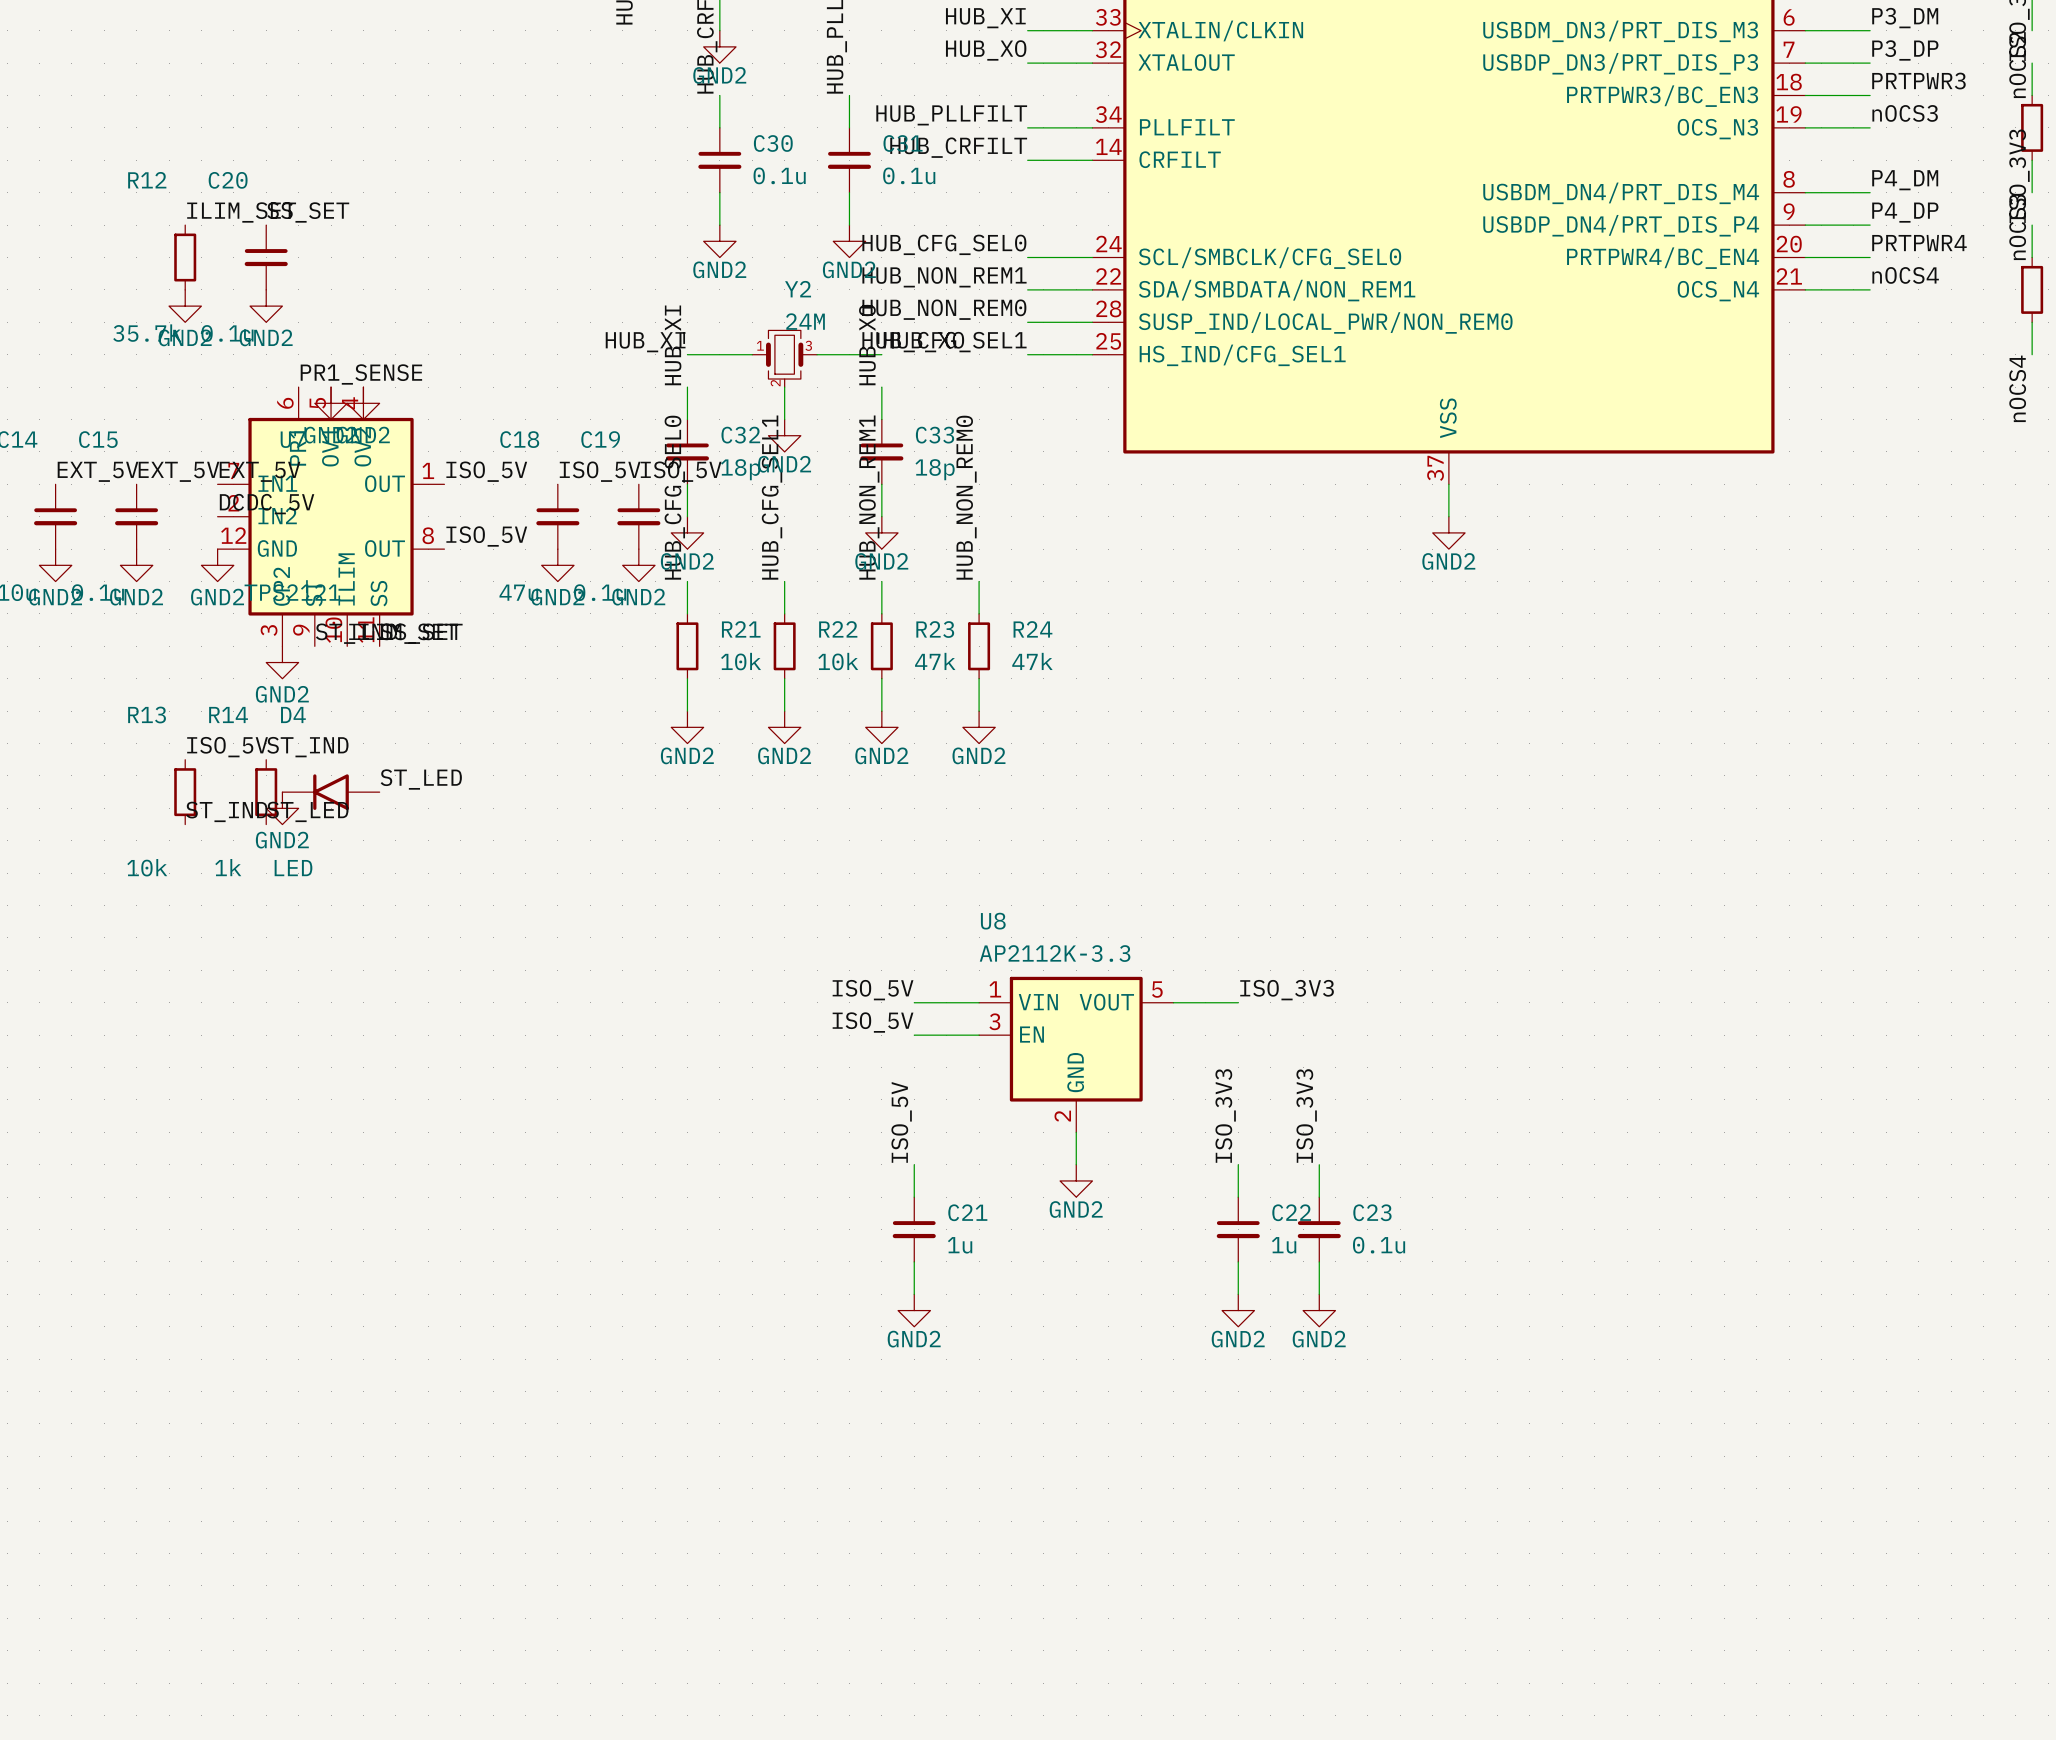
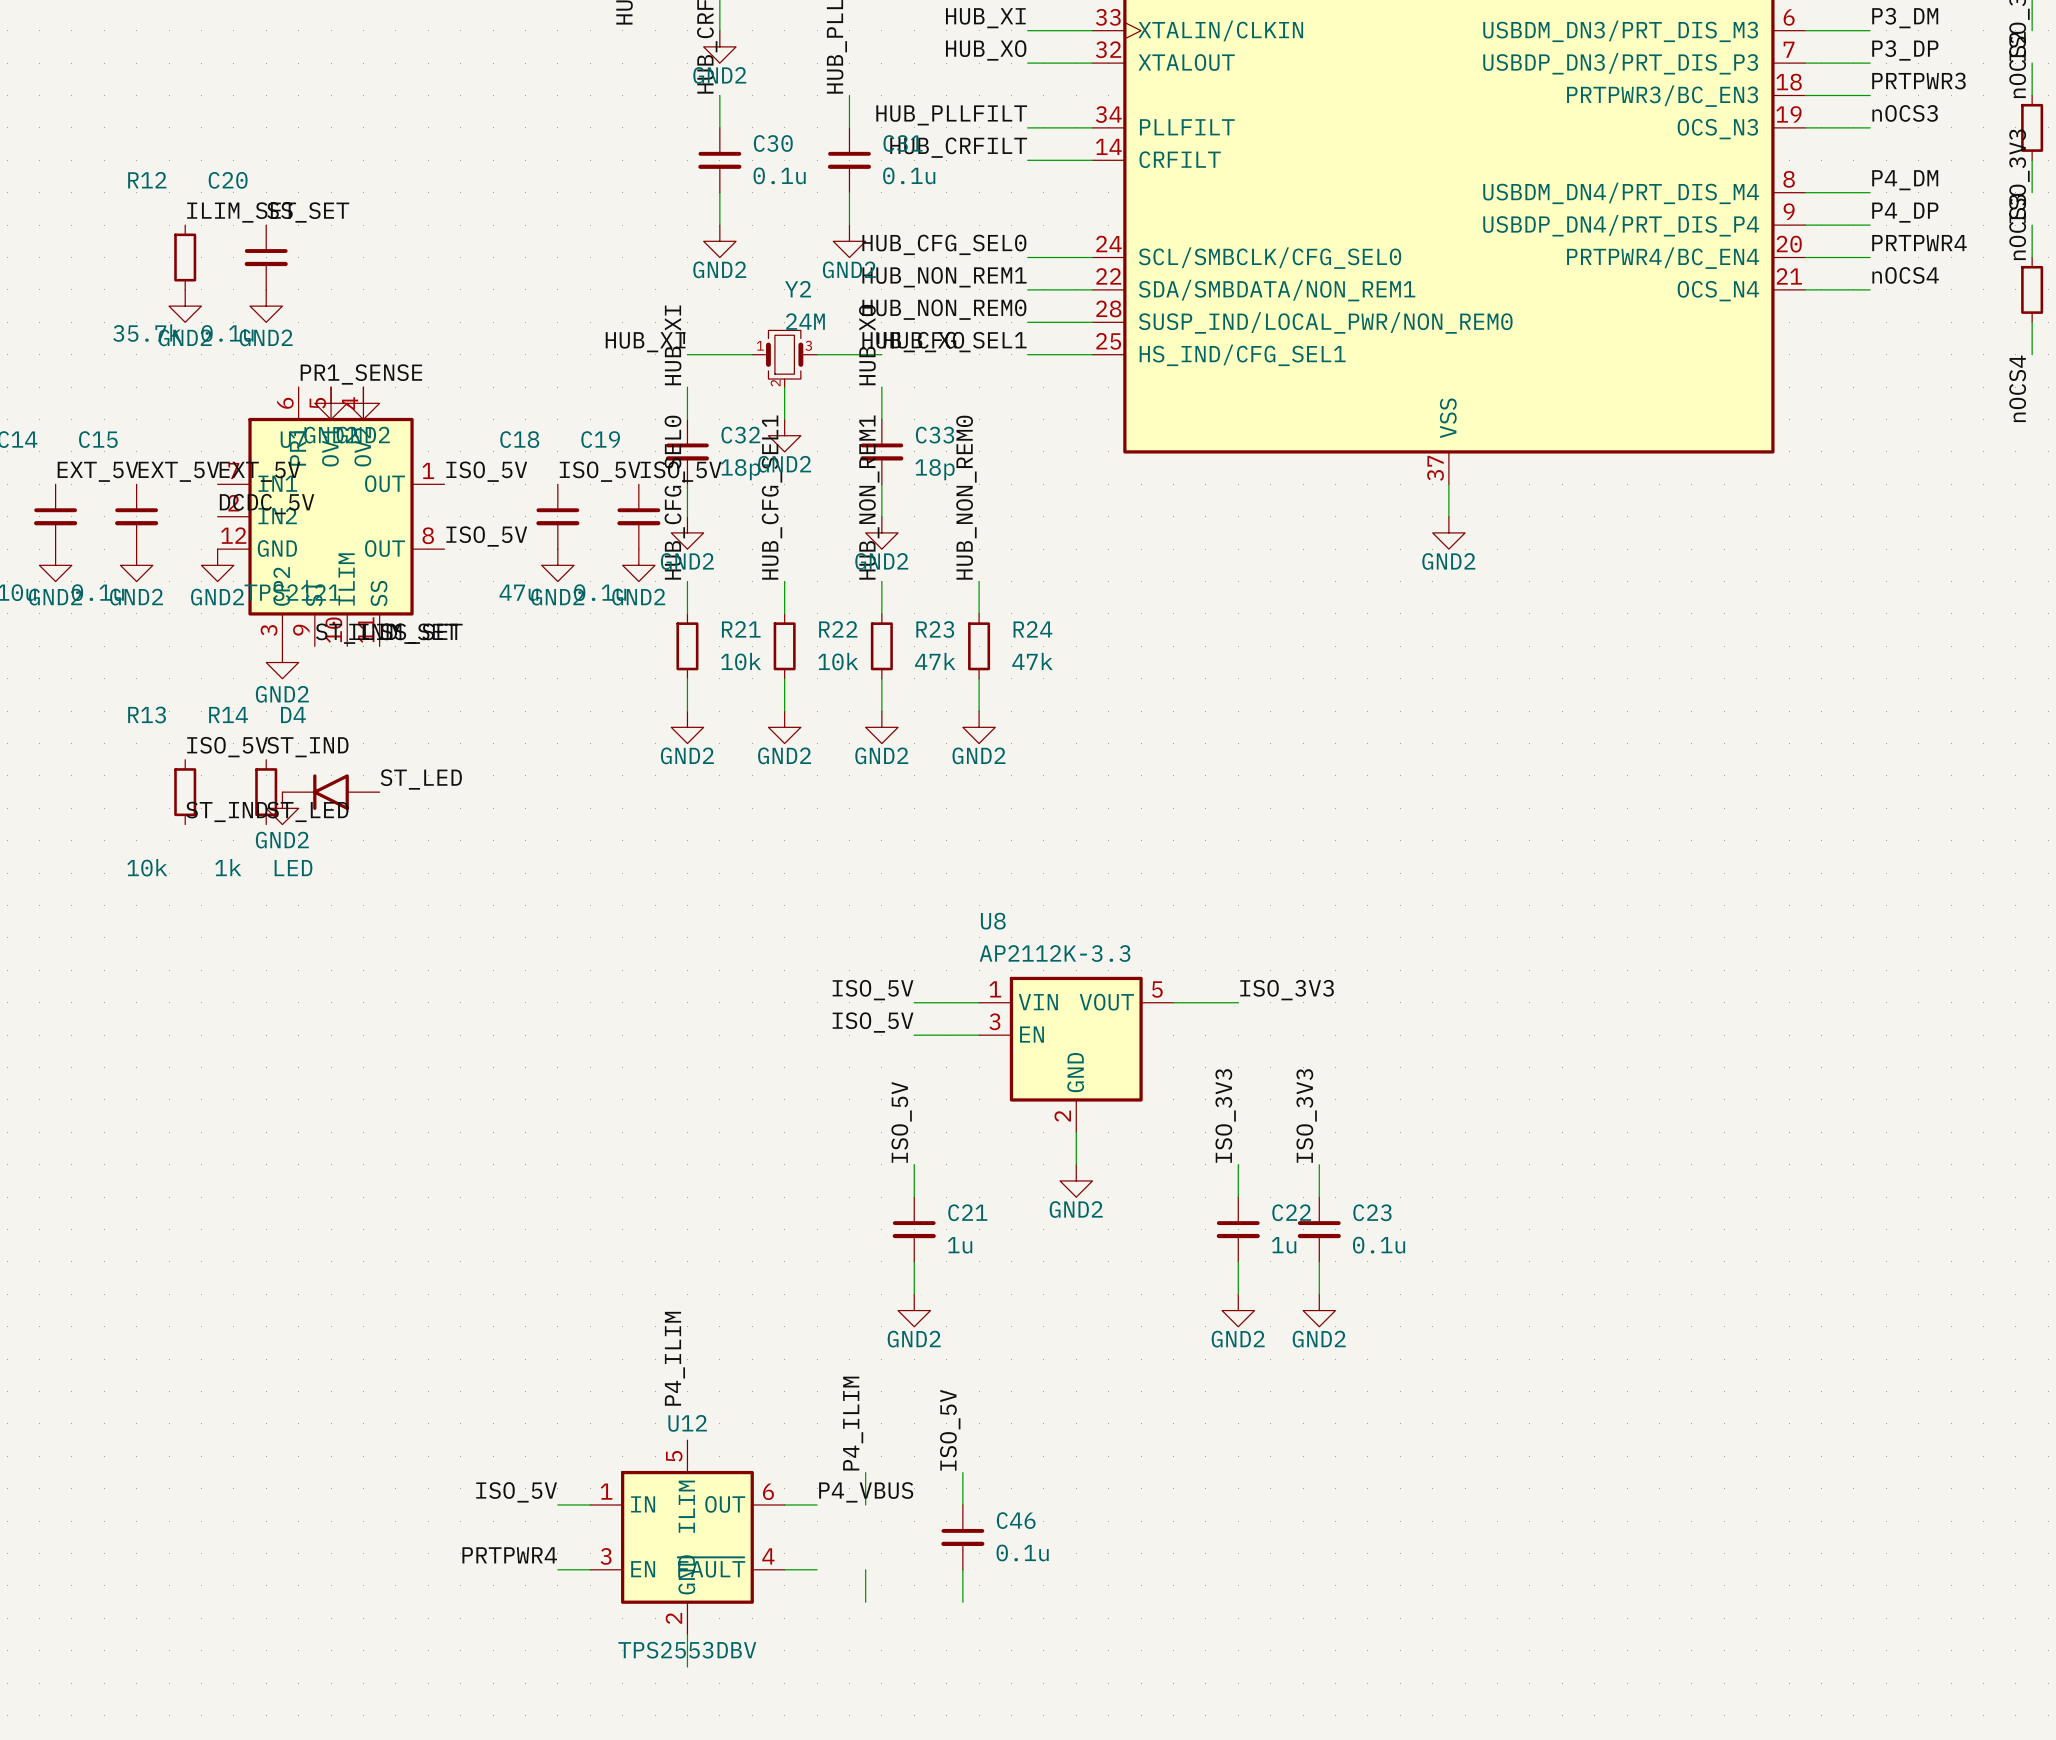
label: none -> P4_ILIM (674, 1358)
label: none -> P4_ILIM (853, 1423)
label: none -> ISO_5V (950, 1430)
wire: none -> (865, 1472) (865, 1504)
wire: none -> (962, 1472) (962, 1504)
label: none -> ISO_5V (516, 1492)
label: none -> P4_VBUS (866, 1492)
wire: none -> (557, 1504) (590, 1504)
wire: none -> (784, 1504) (817, 1504)
U12: none -> TPS2553DBV (687, 1537)
C46: none -> 0.1u (962, 1537)
label: none -> PRTPWR4 (509, 1555)
wire: none -> (557, 1569) (590, 1569)
wire: none -> (784, 1569) (817, 1569)
wire: none -> (865, 1569) (865, 1602)
wire: none -> (962, 1569) (962, 1602)
wire: none -> (687, 1634) (687, 1666)

